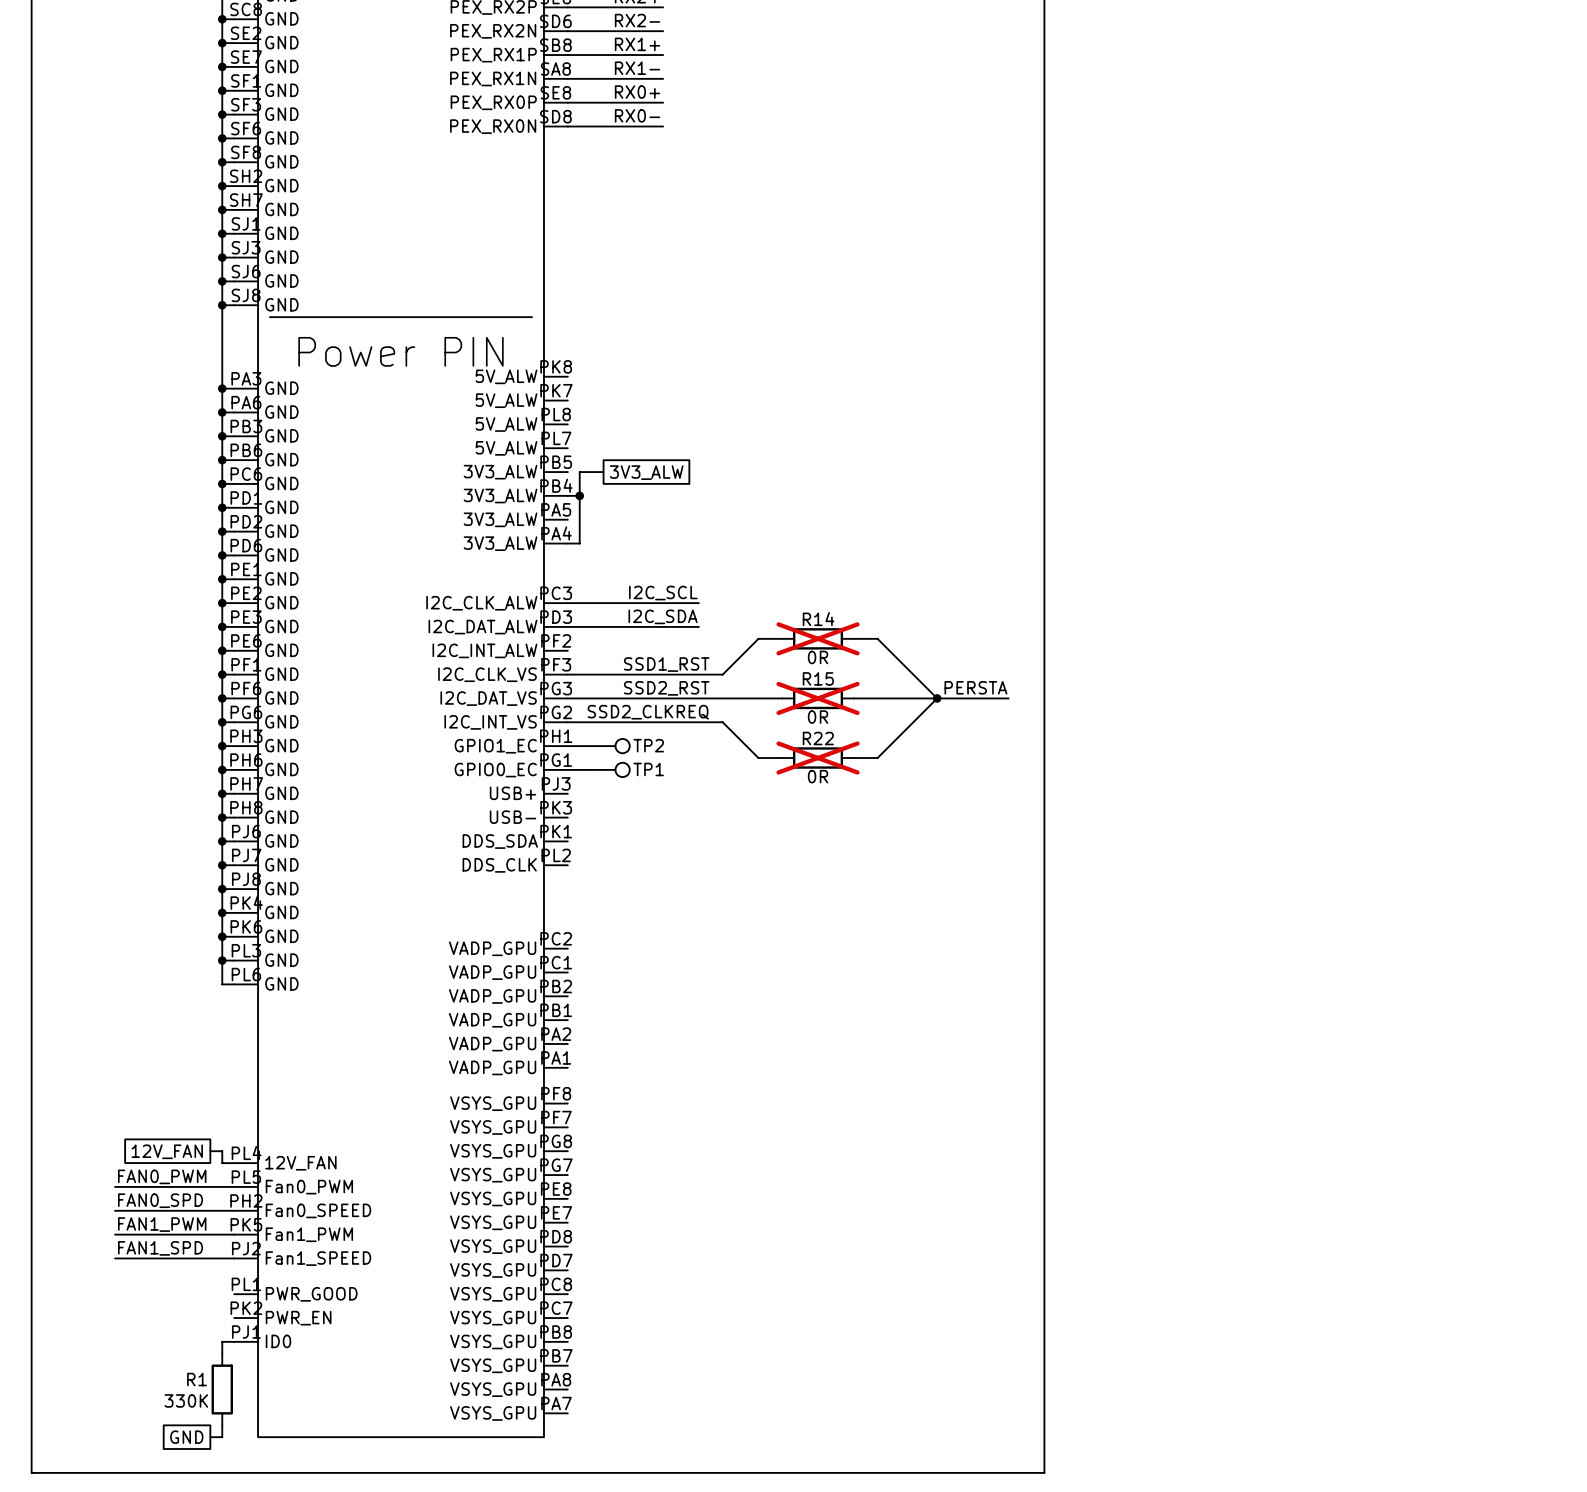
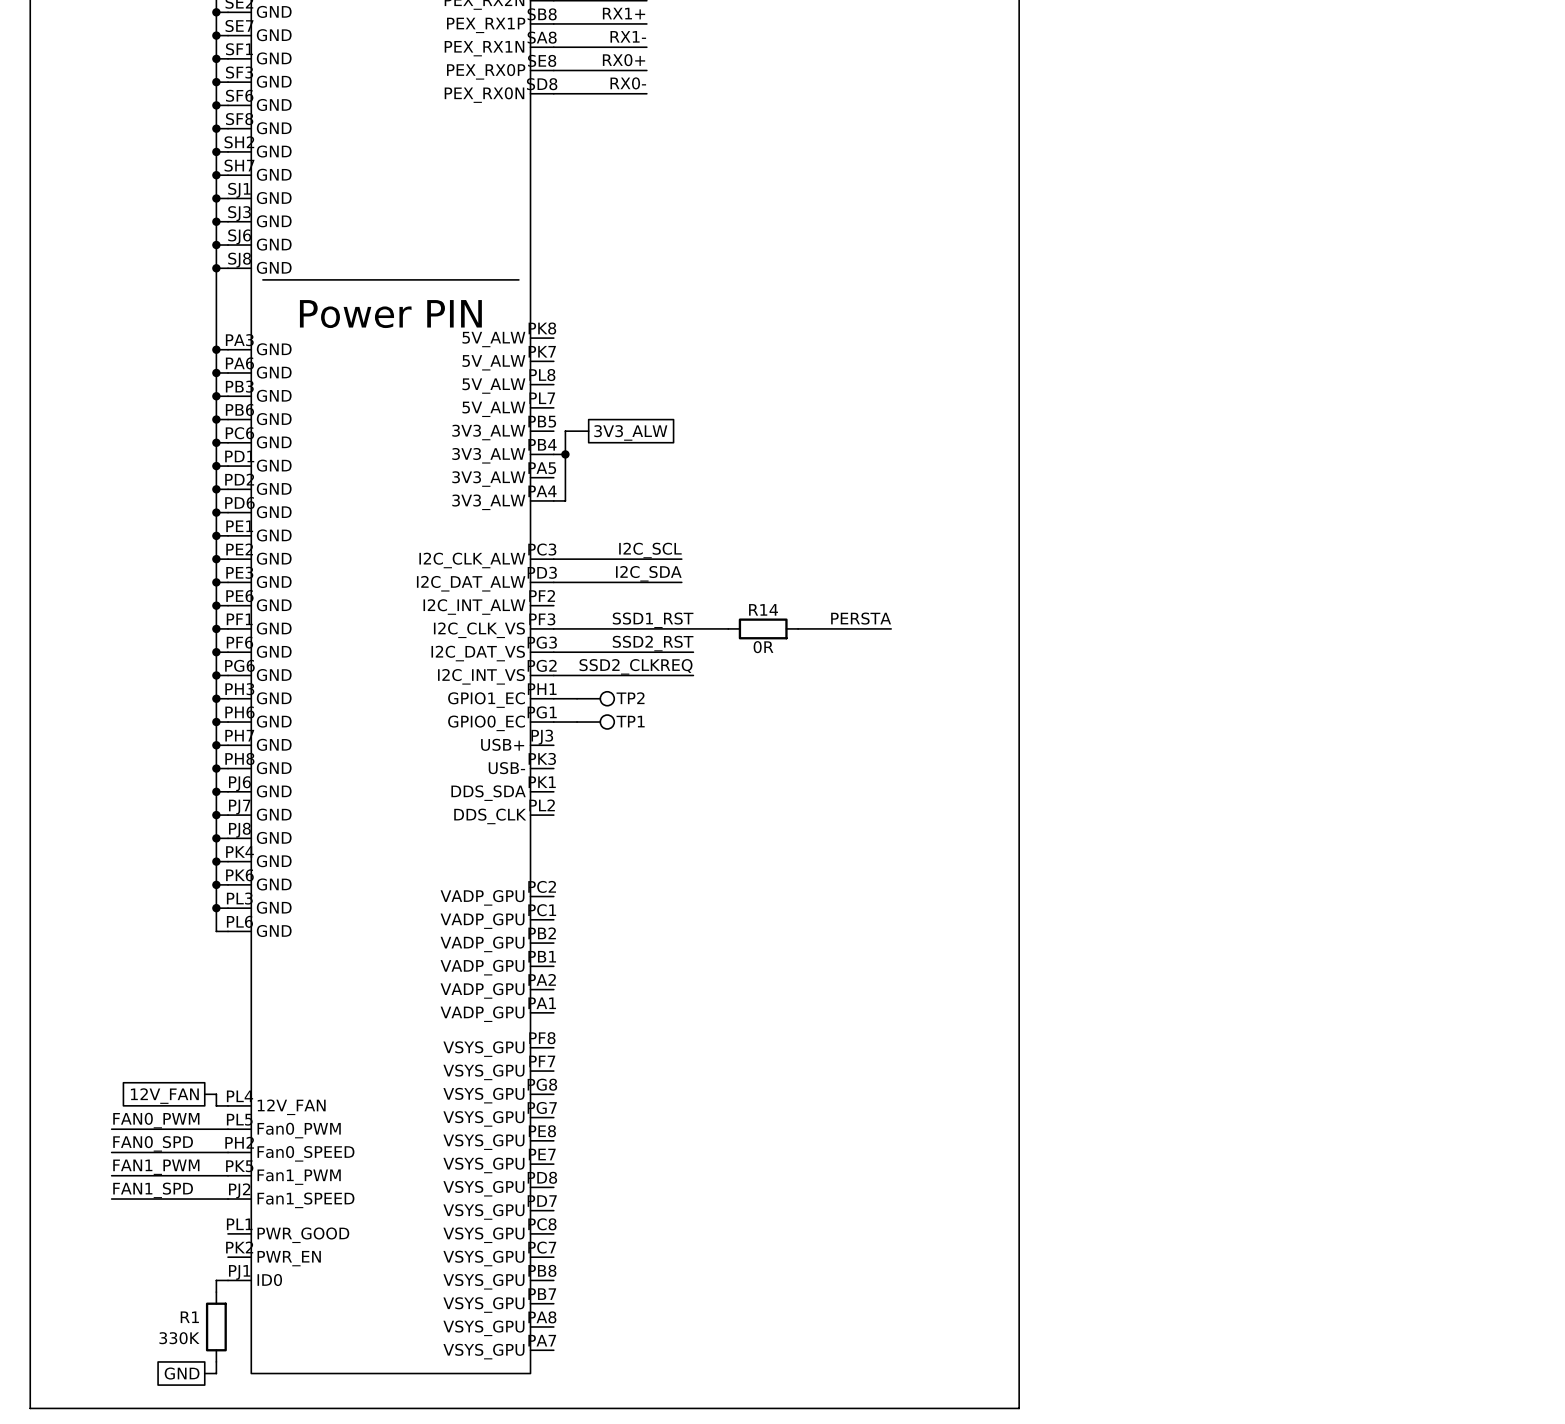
wire: (782, 638) (758, 638) (722, 674) -> (728, 628) (705, 628)
R14 position: (818, 638) -> (763, 628)
R14 do-not-place cross: (818, 638) -> none
wire: (853, 638) (877, 638) (937, 698) (877, 758) (853, 758) -> none
wire: none -> (798, 628) (891, 628)
label position: PERSTA (975, 687) -> PERSTA (861, 618)
wire: (710, 698) (782, 698) -> none
R15: 0R (818, 698) -> none
wire: (853, 698) (1008, 698) -> none
junction: (937, 698) -> none
wire: (710, 722) (722, 722) (758, 758) (782, 758) -> none
R22: 0R (818, 758) -> none

